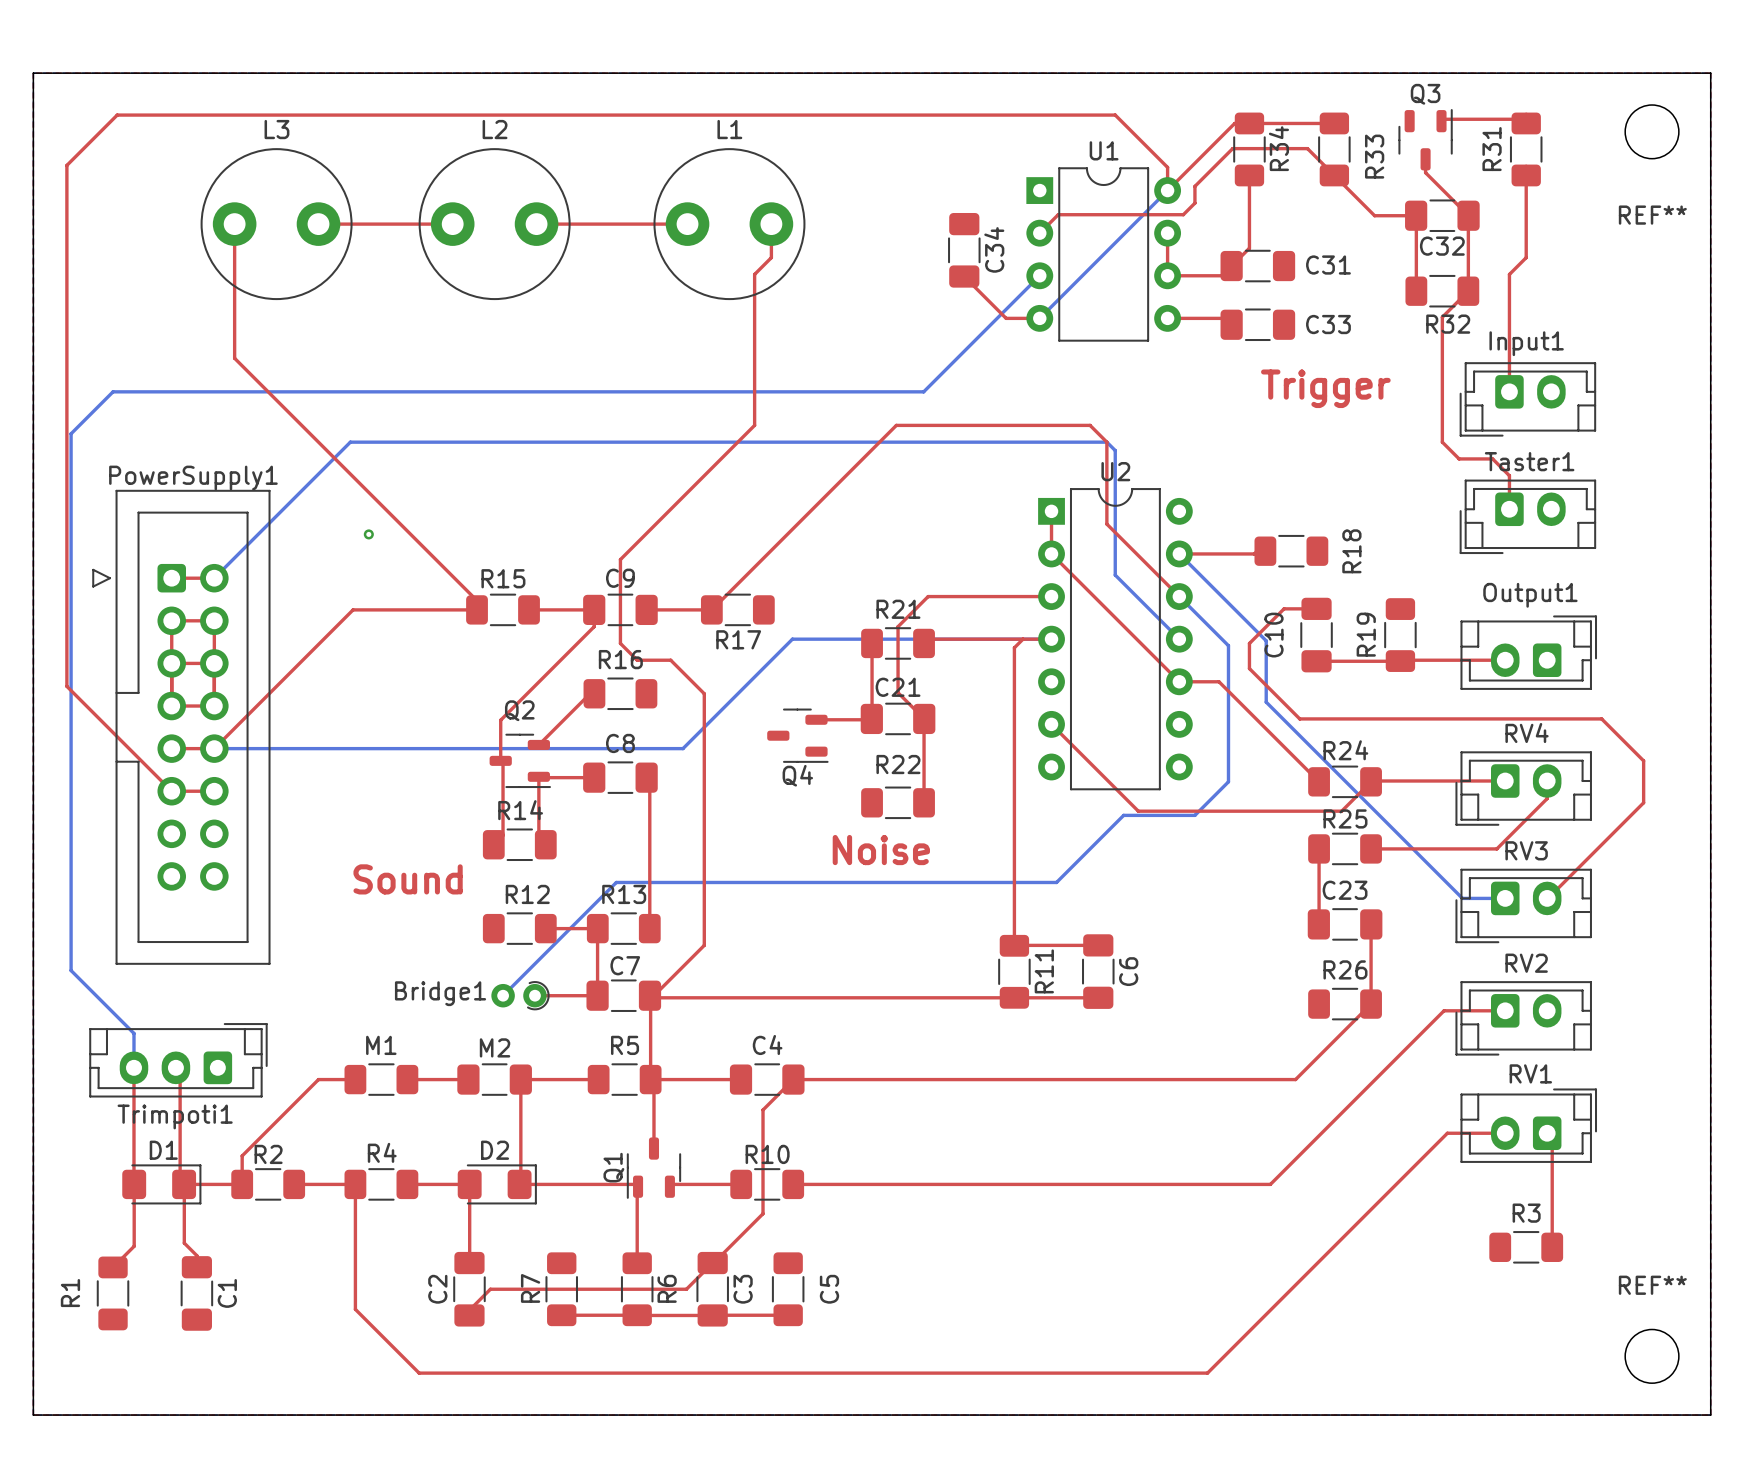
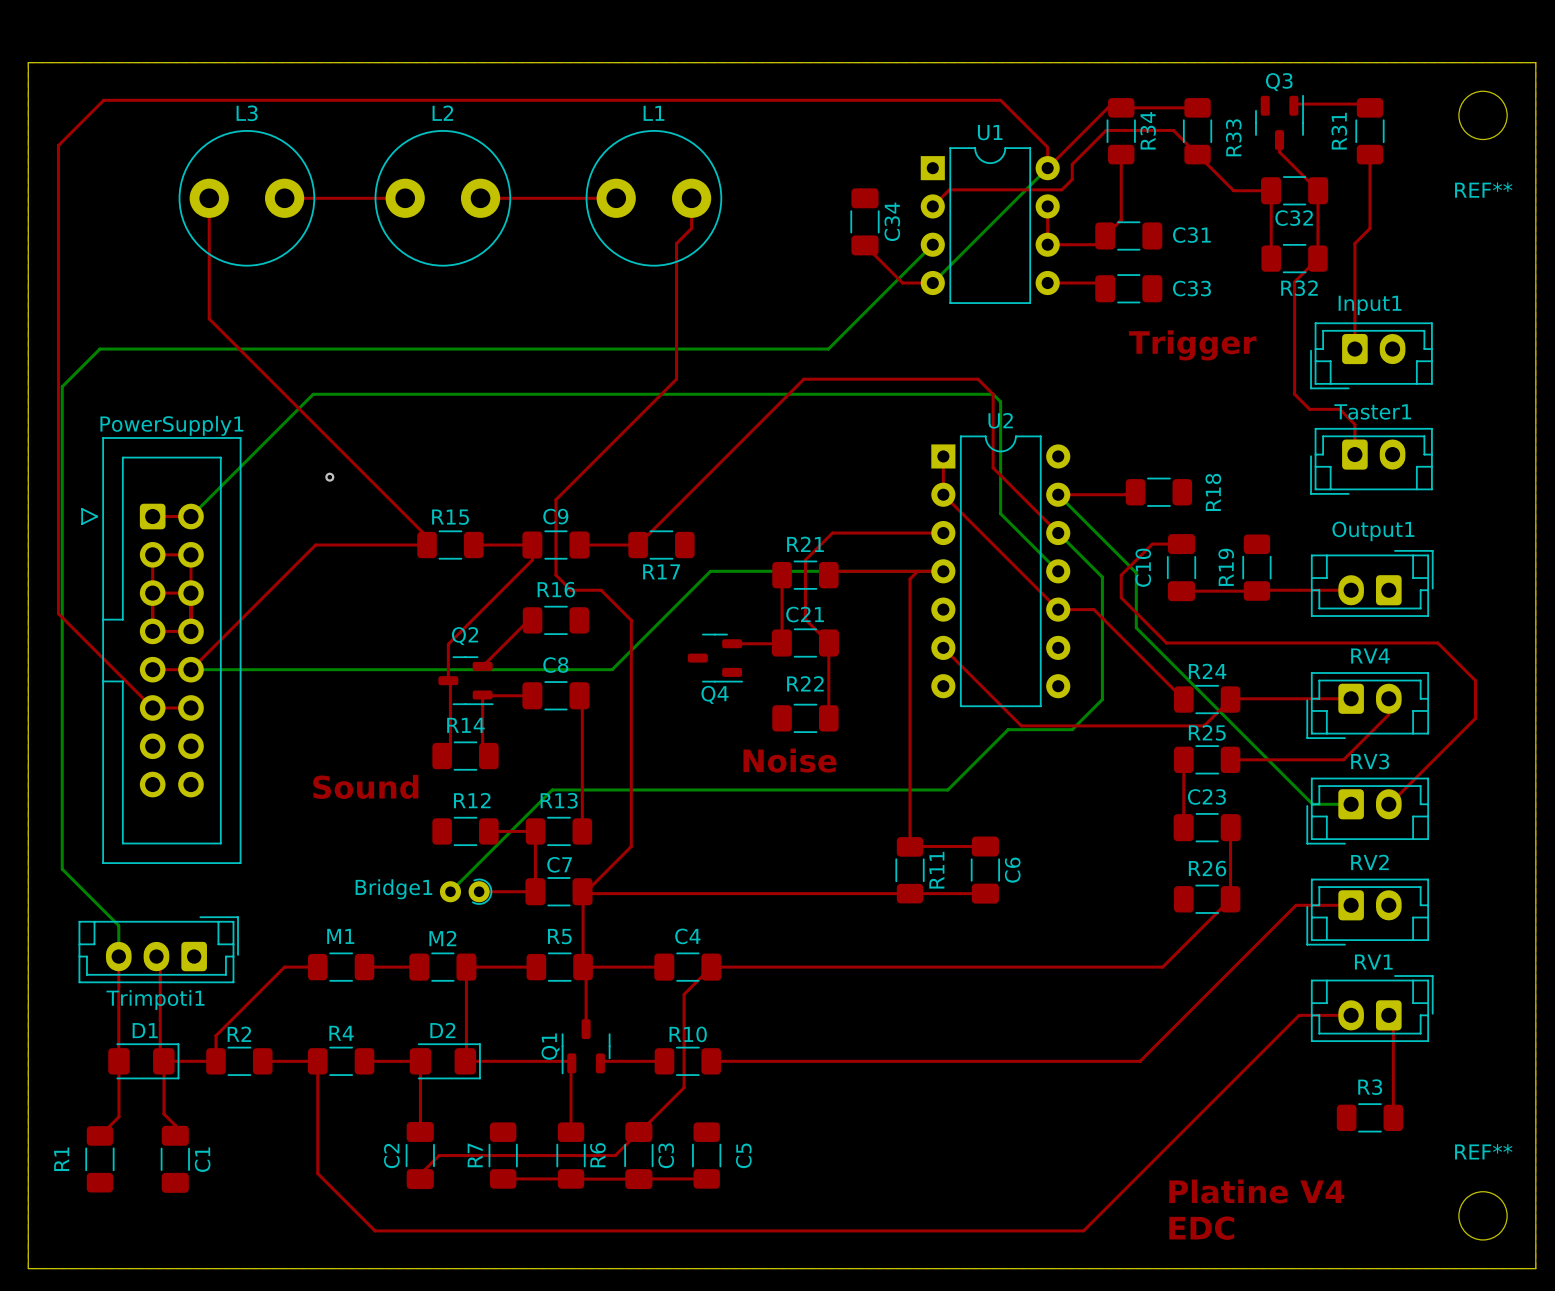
text: none -> Platine V4 (1256, 1191)
text: none -> EDC (1201, 1228)

